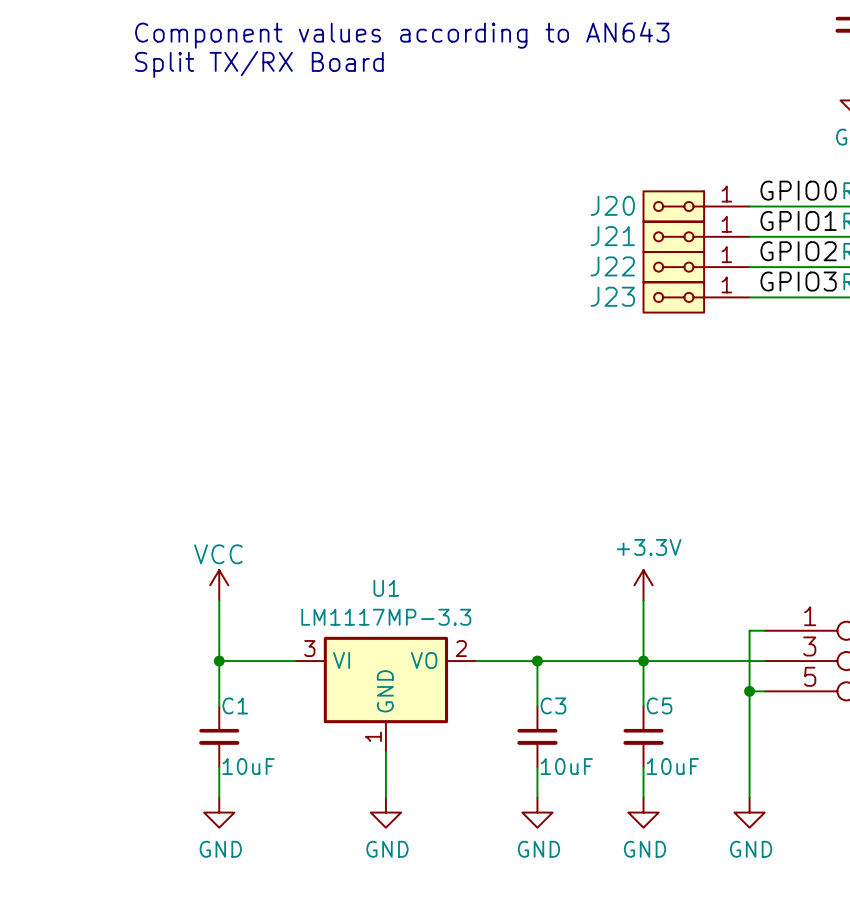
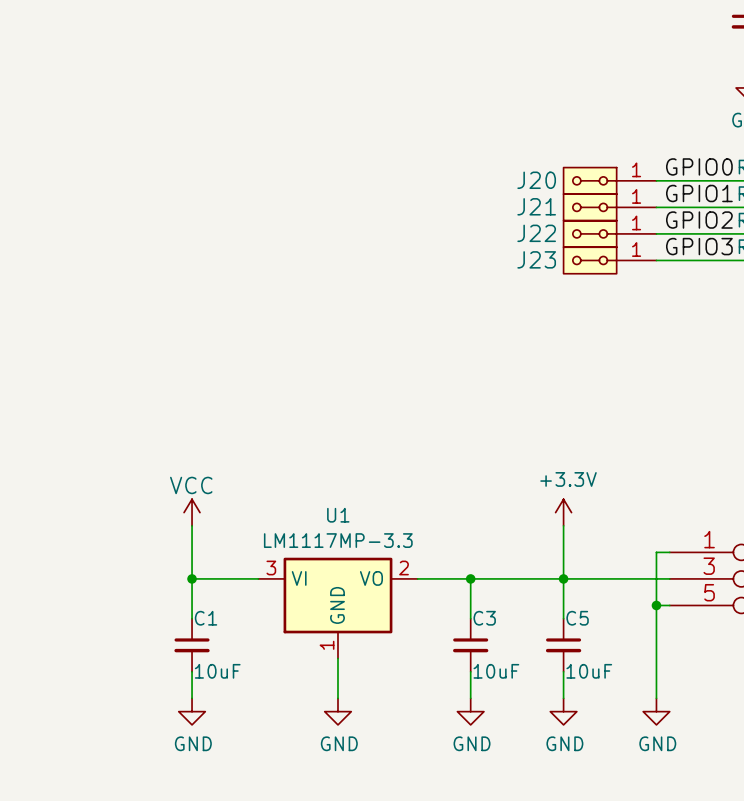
text: Component values according to AN643 (402, 35) -> none
text: Split TX/RX Board (259, 64) -> none

